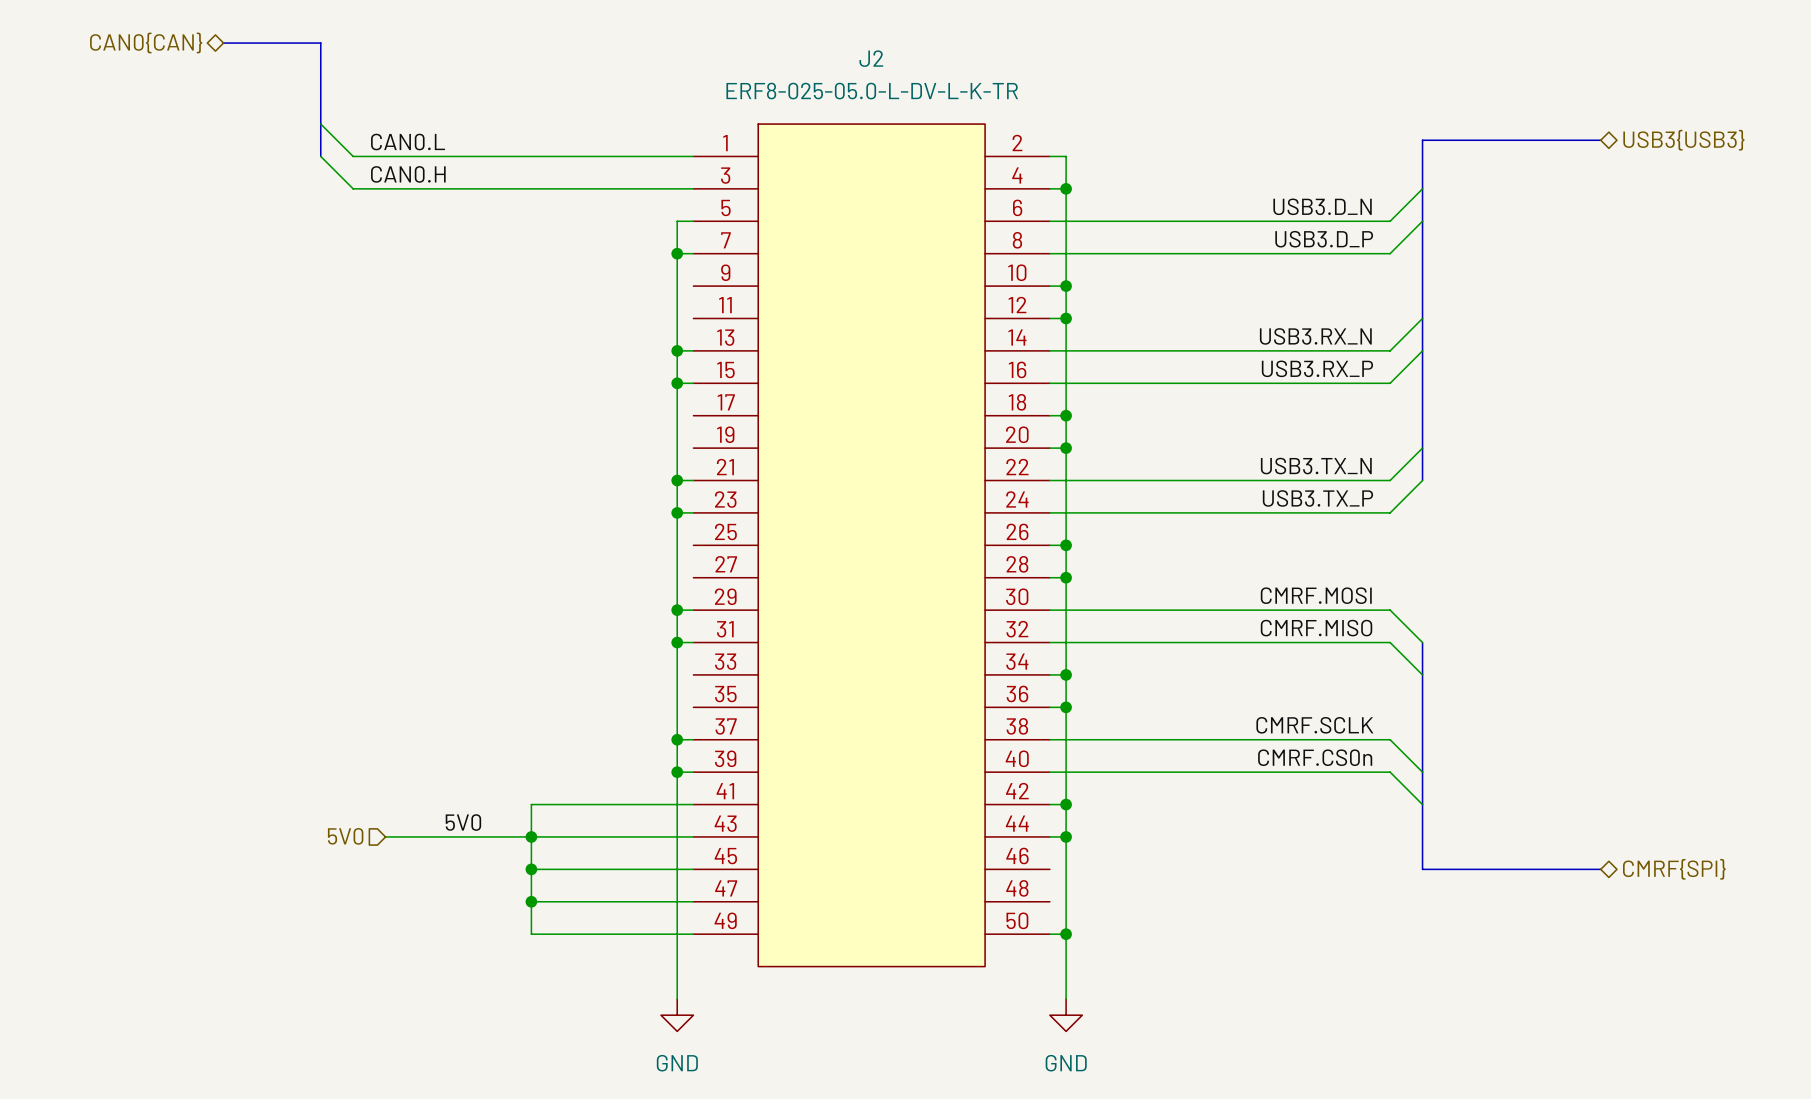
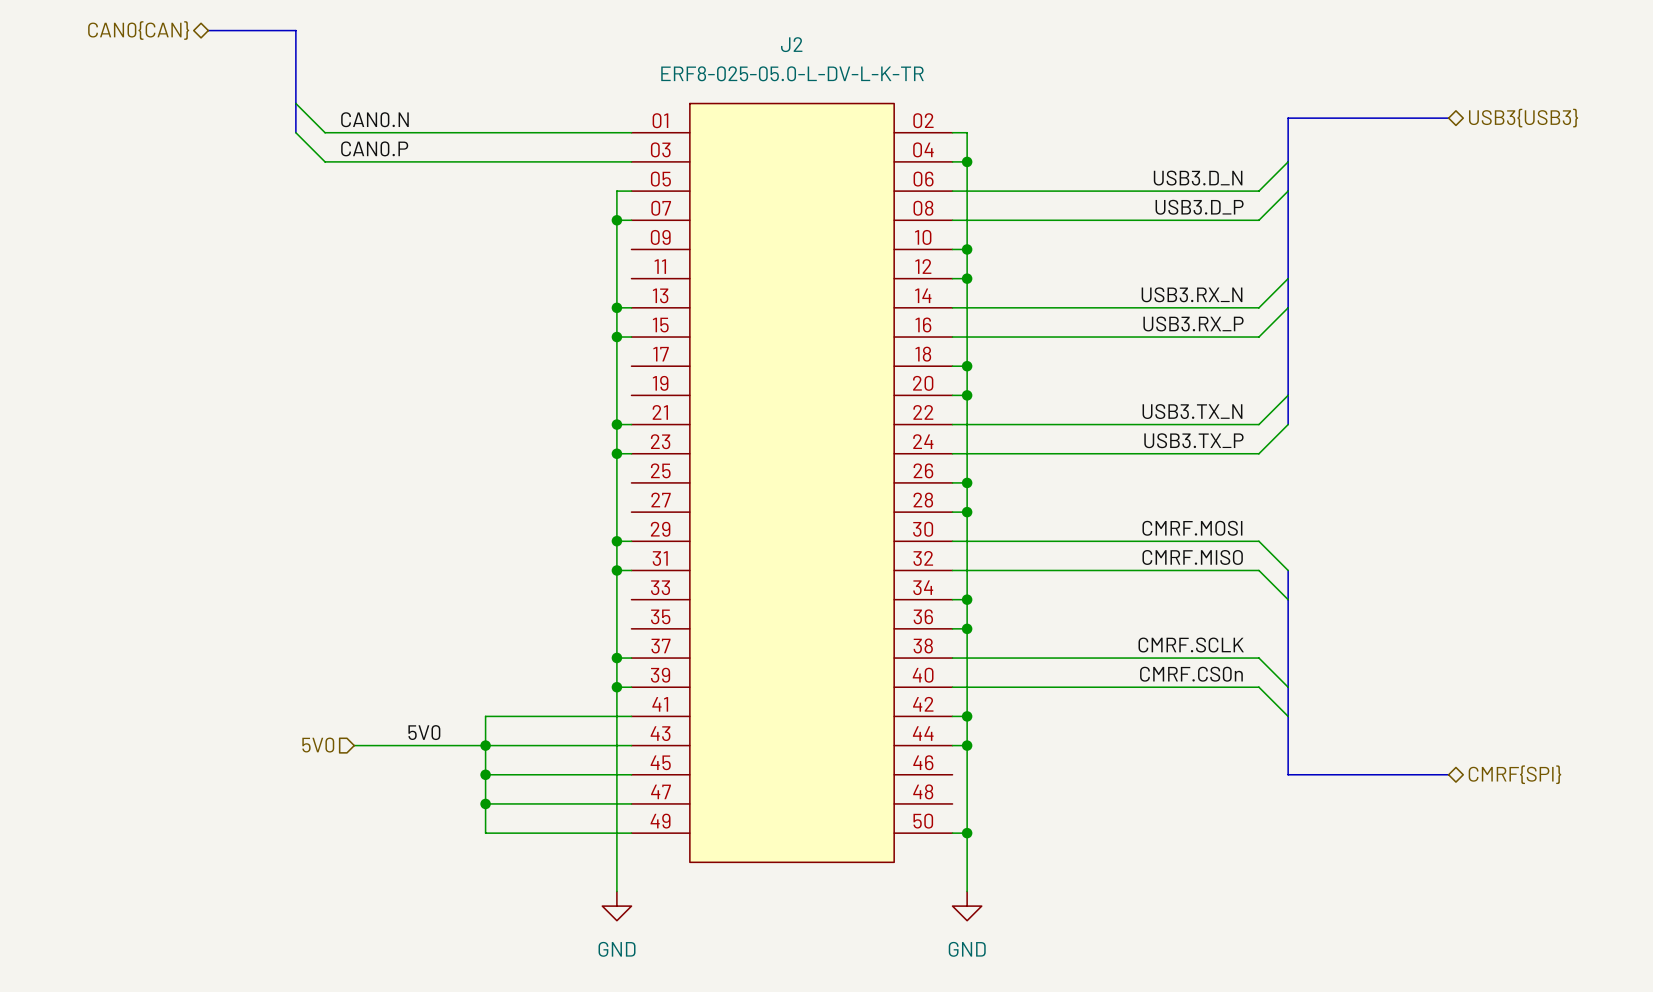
J2 symbol: [693, 124, 1050, 967] -> [631, 103, 953, 863]
label: CAN0.L (407, 142) -> CAN0.N (374, 119)
label: CAN0.H (408, 174) -> CAN0.P (374, 148)

